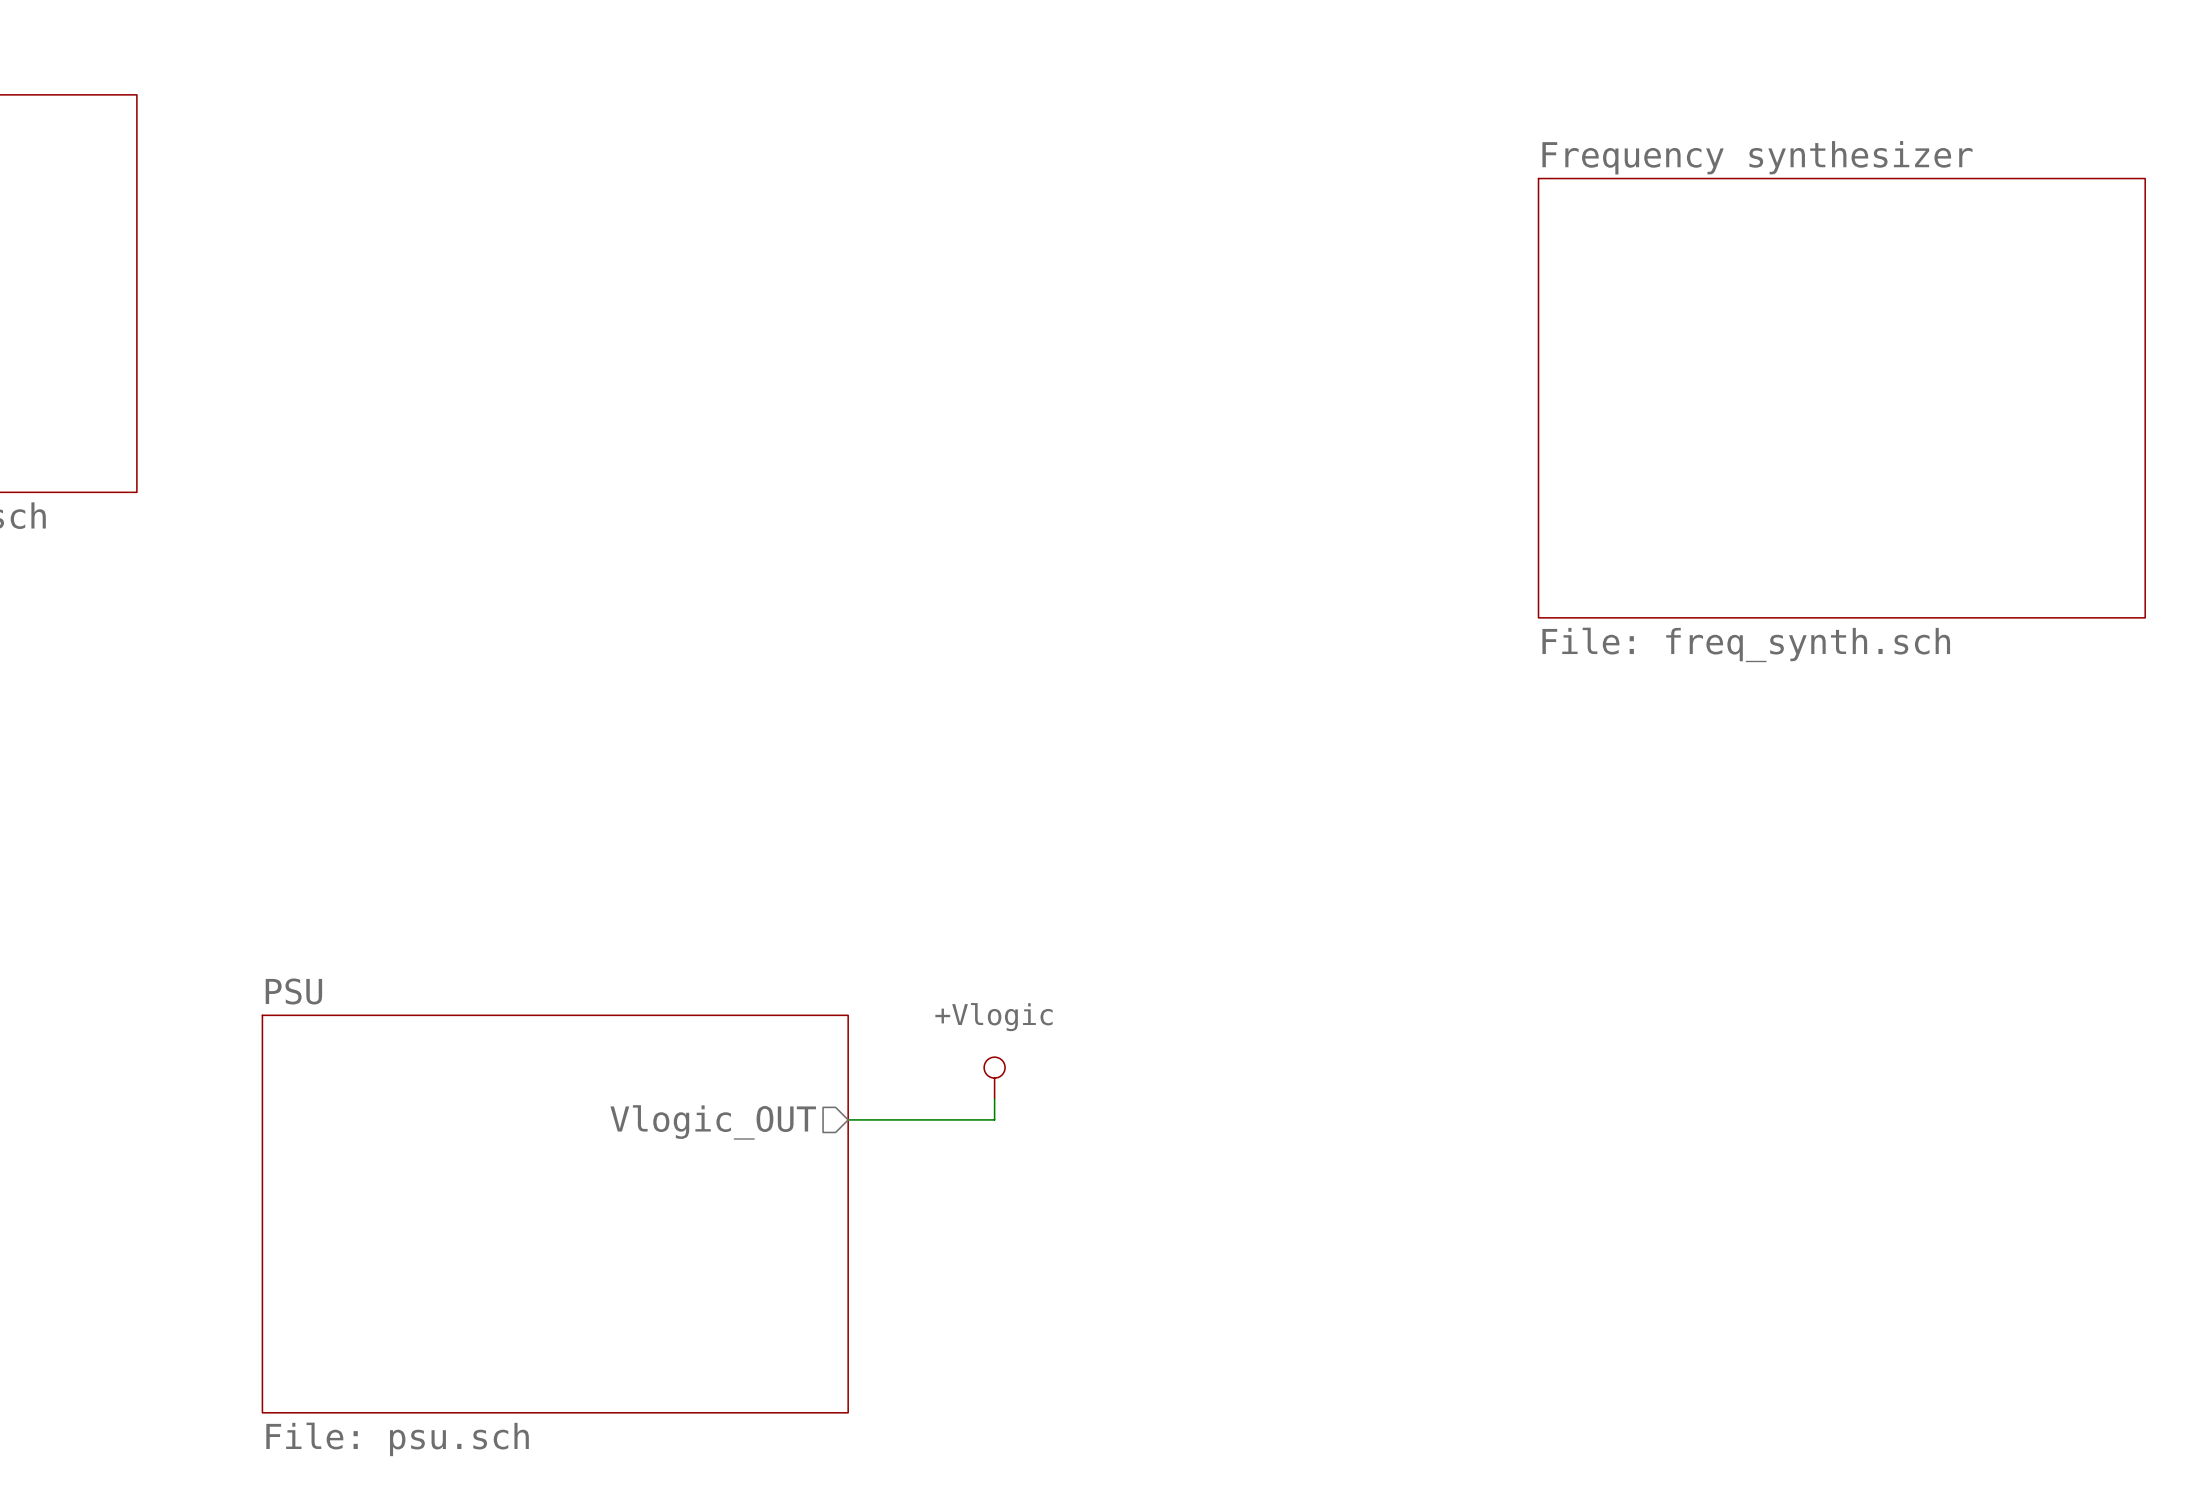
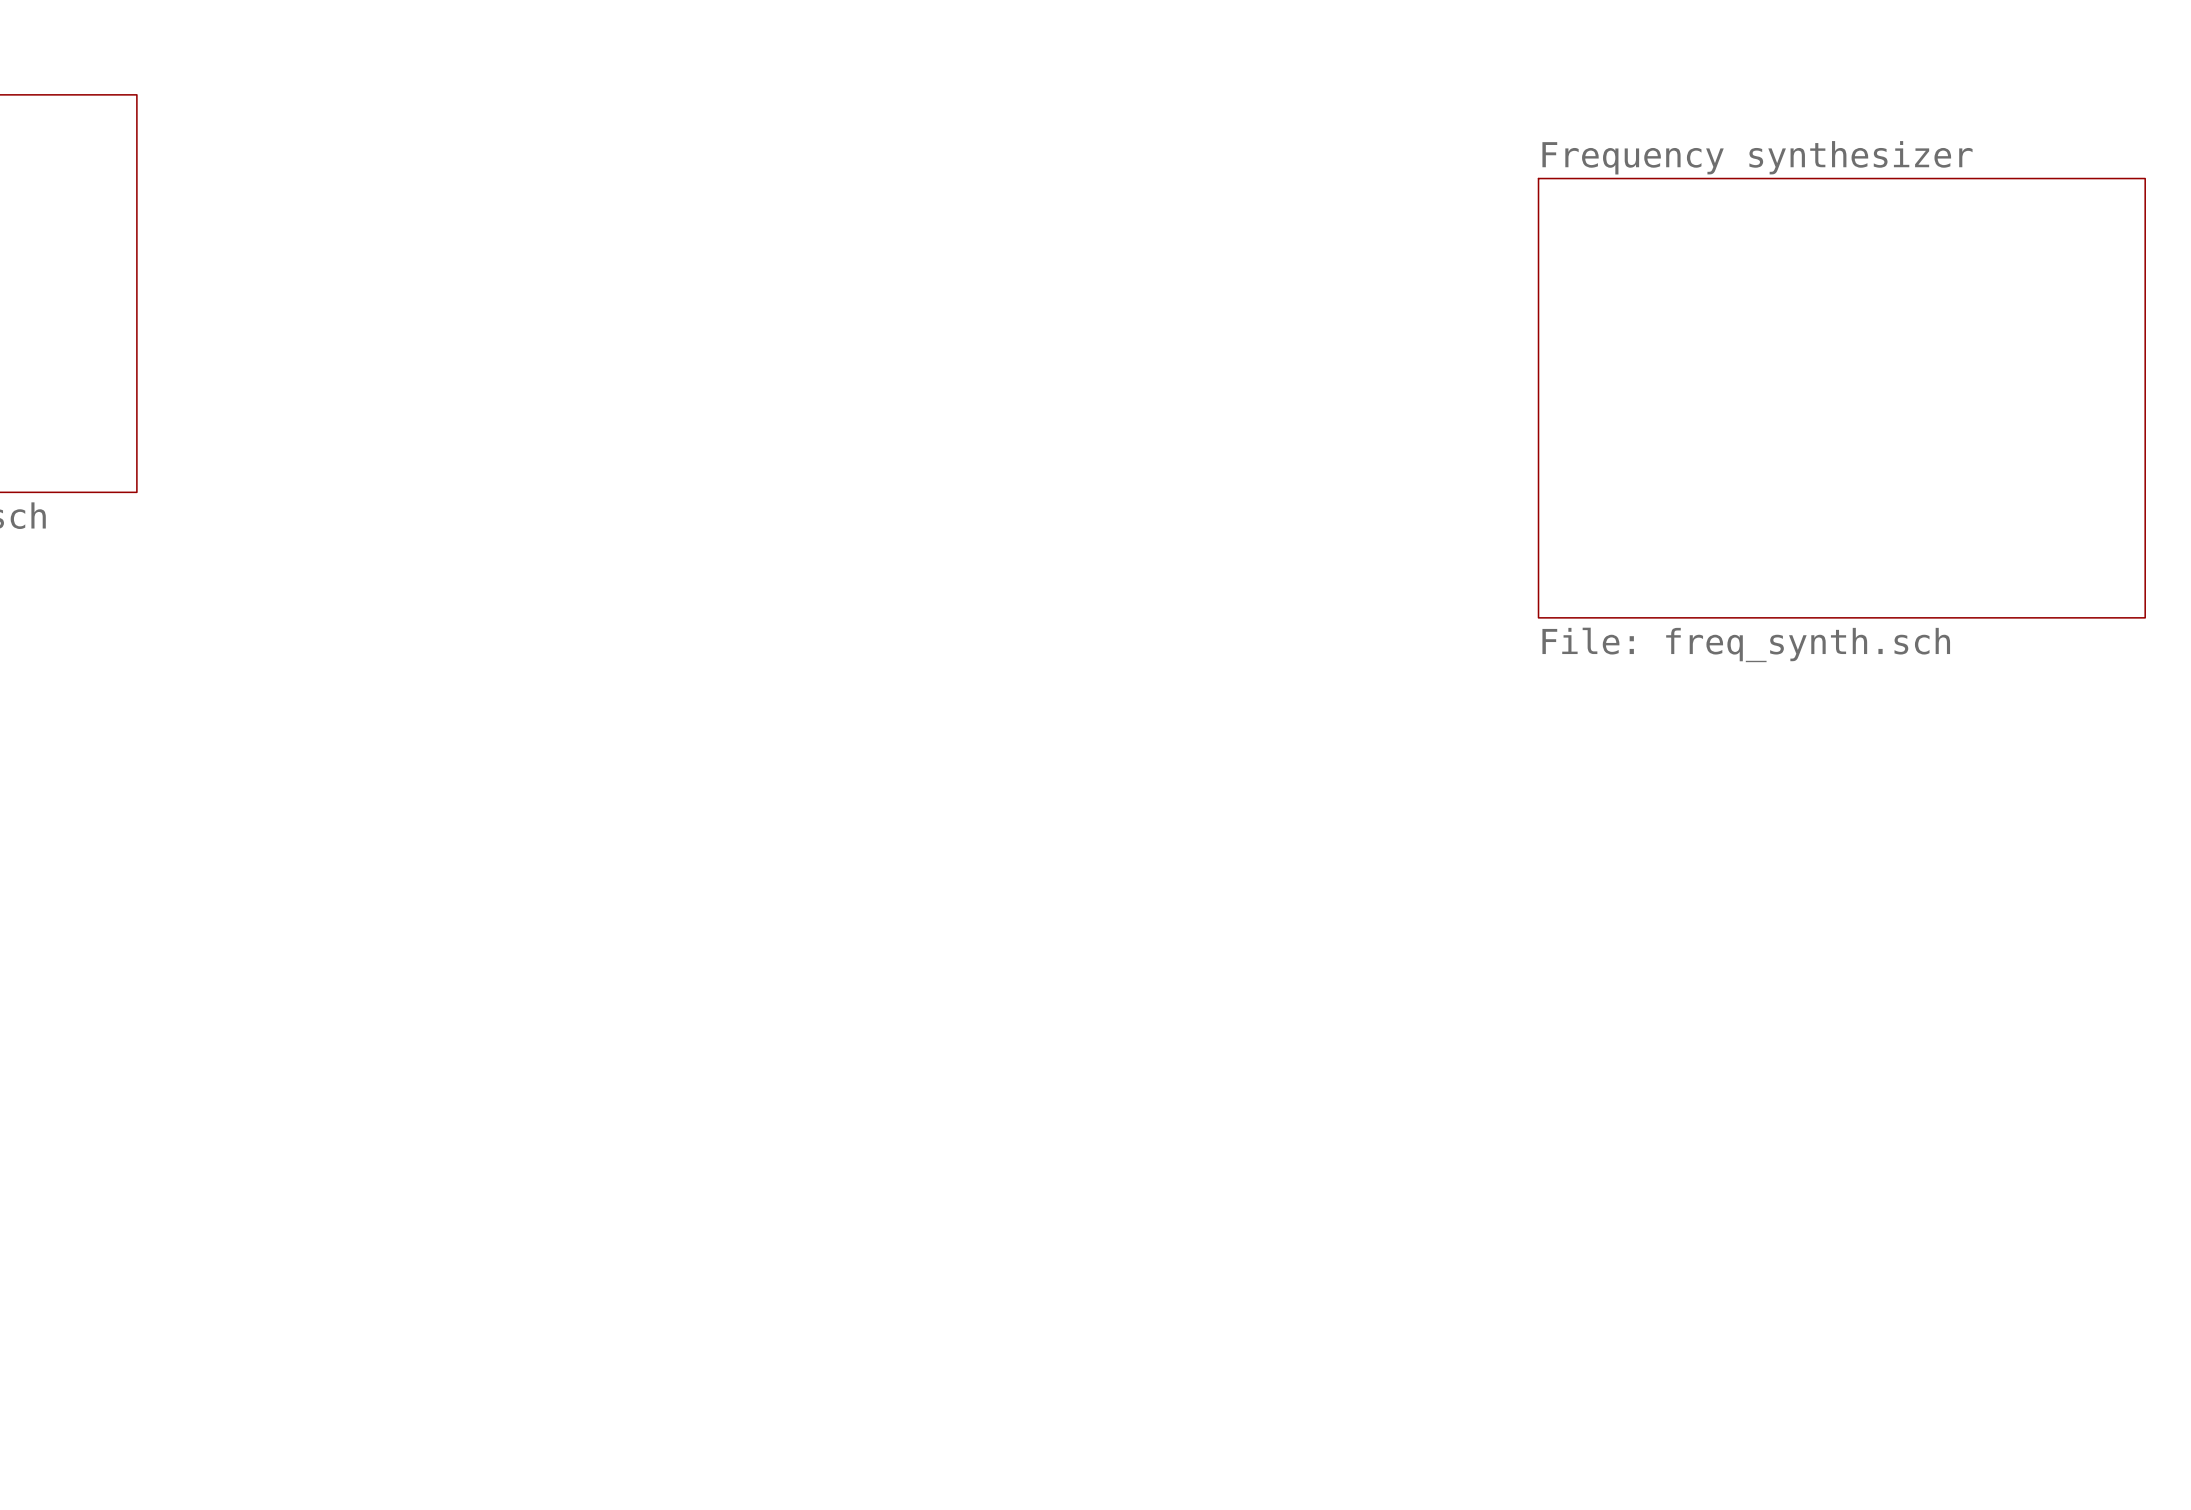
power symbol: +Vlogic (994, 1078) -> none
wire: (994, 1099) (994, 1119) (848, 1119) -> none
sheet pin: Vlogic_OUT (713, 1122) -> none
sheet PSU: File: psu.sch (555, 1214) -> none

